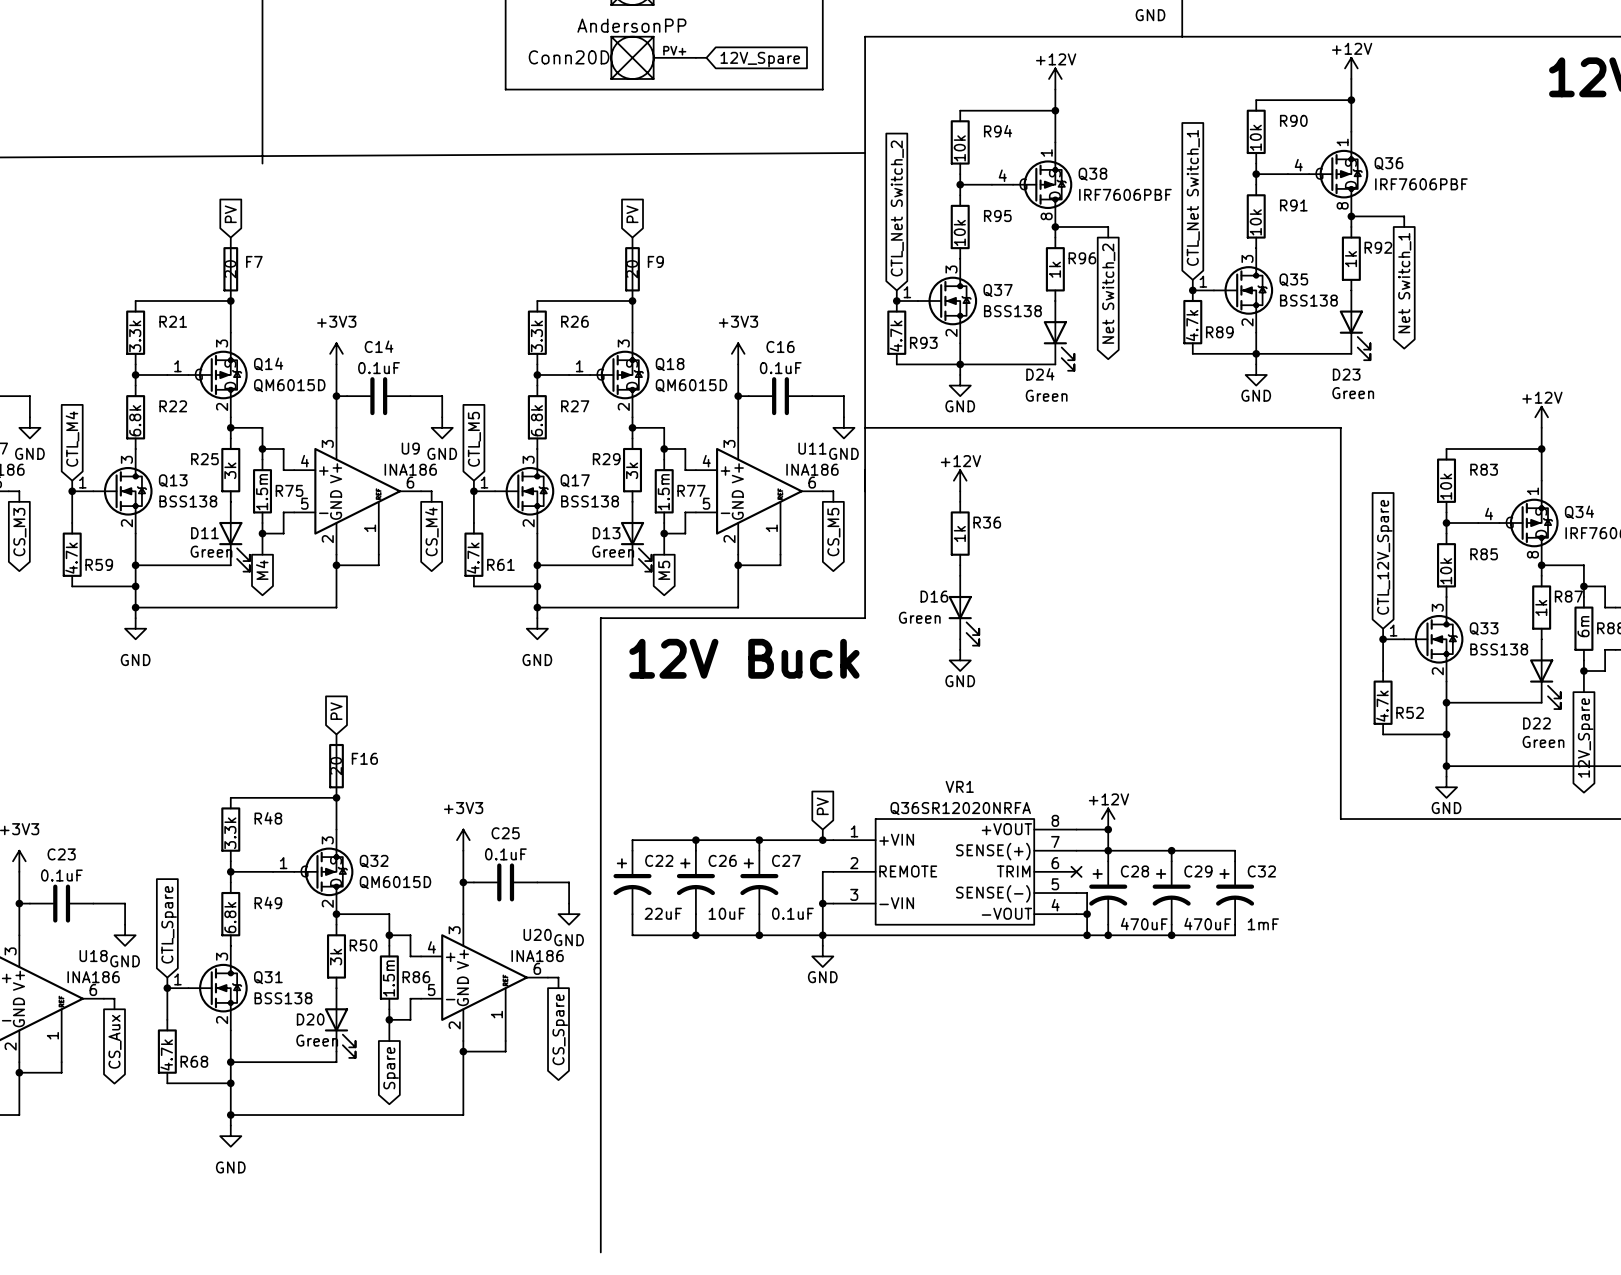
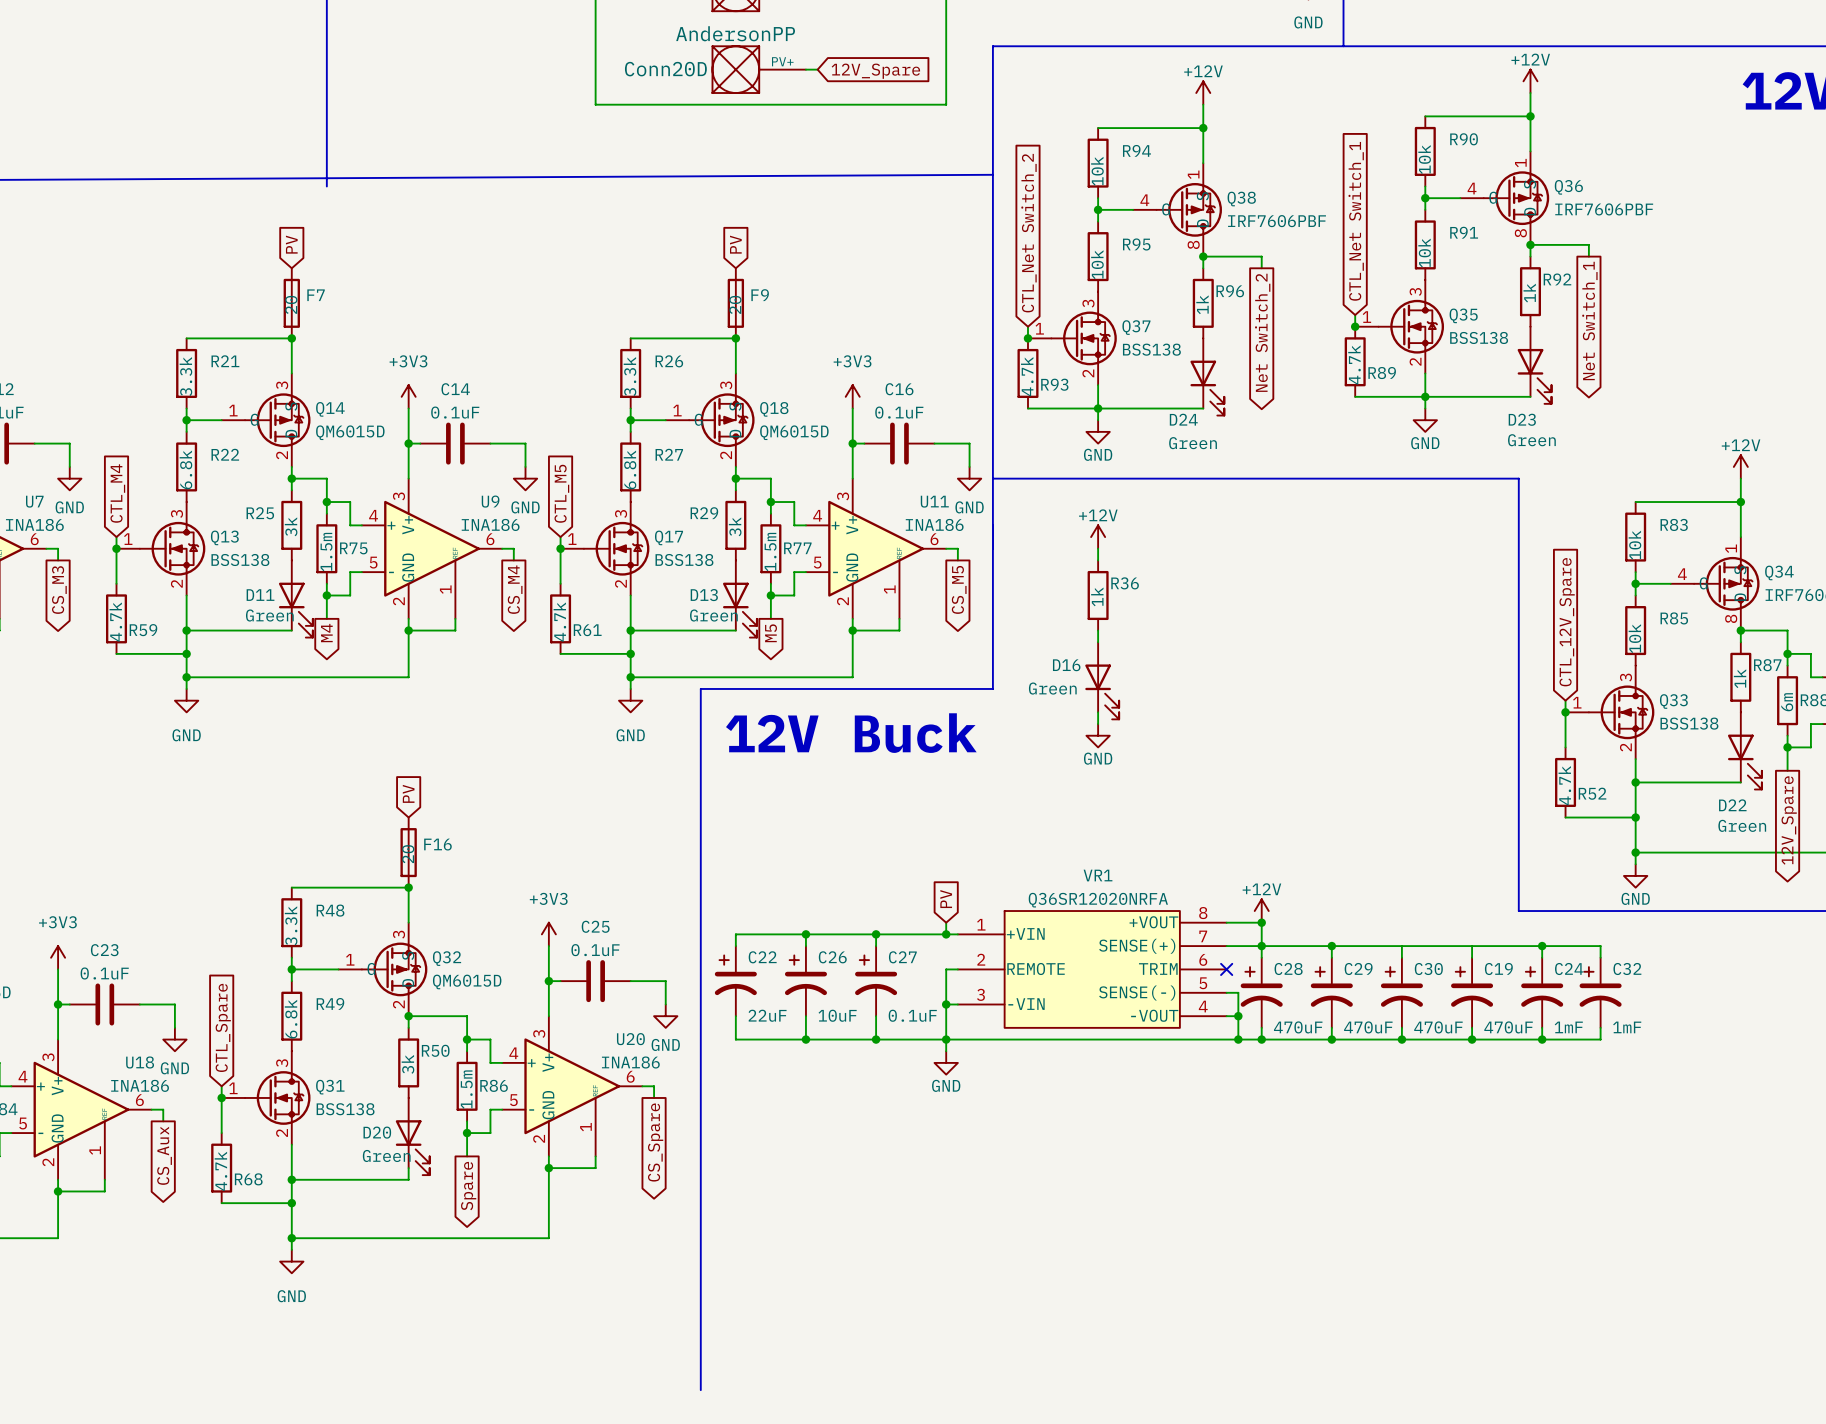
wire: none -> (1401, 946) (1600, 946) (1600, 957)
wire: none -> (1472, 946) (1472, 957)
wire: none -> (1542, 946) (1542, 957)
junction: none -> (1542, 946)
C32 name: C32 (1261, 871) -> C30 (1428, 969)
C19: none -> 470uF (1472, 992)
C24: none -> 1mF (1542, 992)
C32: none -> 1mF (1600, 992)
C32 value: 1mF (1263, 924) -> 470uF (1438, 1027)
wire: none -> (1472, 1027) (1472, 1039)
wire: none -> (1542, 1027) (1542, 1039)
wire: none -> (1600, 1027) (1600, 1039) (1401, 1039)
junction: none -> (1401, 1039)
junction: none -> (1472, 1039)
junction: none -> (1542, 1039)

